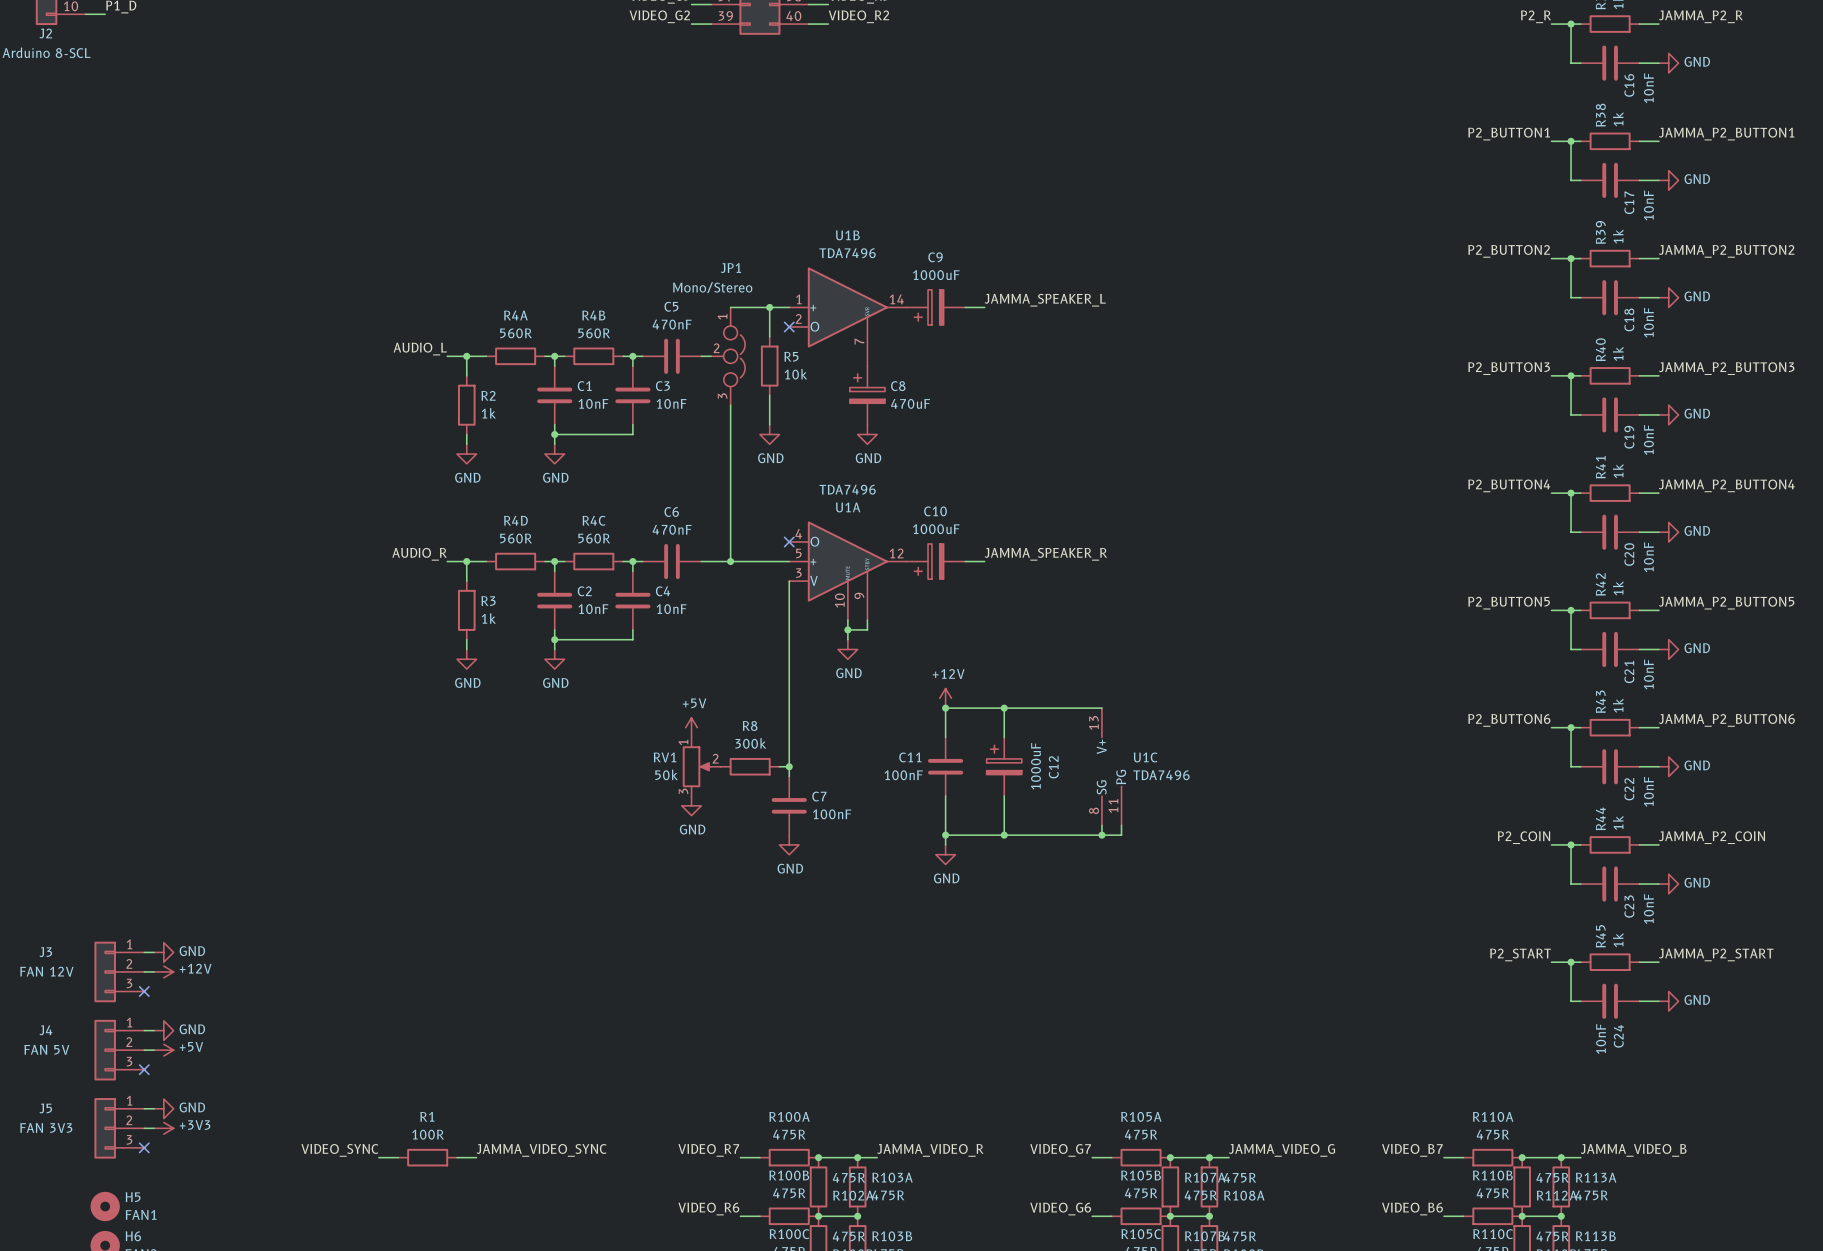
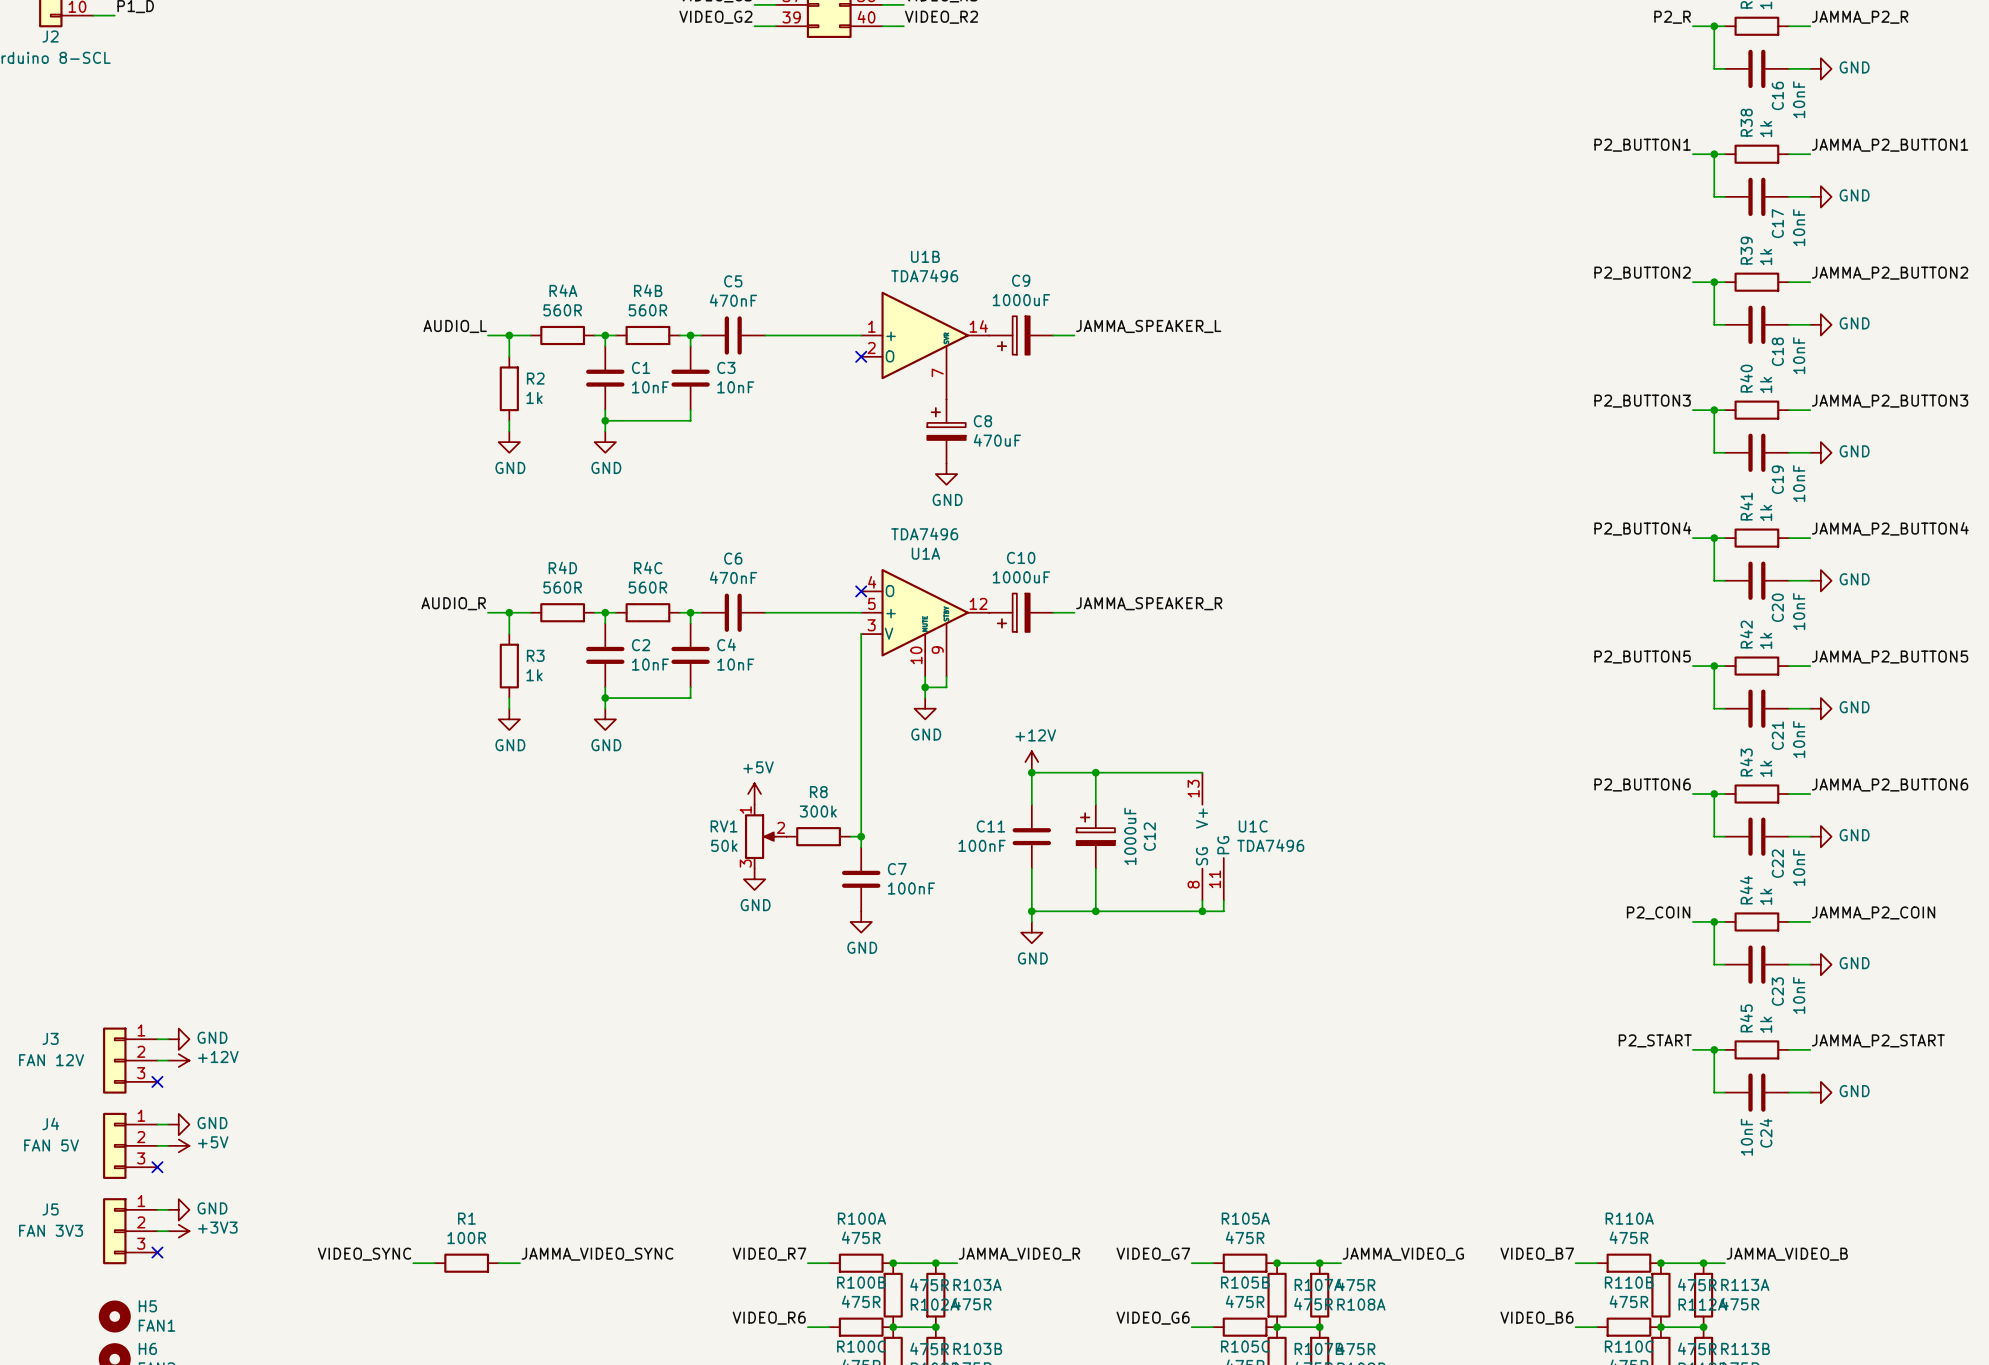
junction: none -> (509, 335)
junction: none -> (605, 335)
junction: none -> (690, 335)
wire: none -> (765, 335) (797, 335)
wire: (769, 307) (769, 336) -> none
junction: (769, 307) -> none
label position: AUDIO_L (420, 349) -> AUDIO_L (455, 326)
wire: (447, 356) (486, 356) -> (487, 335) (530, 335)
wire: (466, 356) (466, 375) -> (509, 335) (509, 356)
junction: (466, 356) -> none
R4A position: (515, 356) -> (562, 335)
wire: (544, 356) (564, 356) -> (594, 335) (615, 335)
junction: (554, 356) -> none
R4B position: (593, 356) -> (647, 335)
wire: (623, 356) (642, 356) -> (679, 335) (701, 335)
junction: (632, 356) -> none
C5 position: (671, 356) -> (733, 335)
wire: (701, 356) (711, 356) -> none
JP1: Mono/Stereo (728, 356) -> none
R5: 10k (769, 366) -> none
junction: none -> (605, 420)
C1 position: (554, 395) -> (605, 378)
C3 position: (632, 395) -> (690, 378)
wire: (769, 395) (769, 424) -> none
R2 position: (466, 405) -> (509, 388)
wire: (730, 405) (730, 561) -> none
wire: (632, 424) (632, 434) (554, 434) -> (690, 410) (690, 420) (605, 420)
wire: (466, 434) (466, 444) -> (509, 420) (509, 431)
junction: (554, 434) -> none
power symbol: GND (769, 434) -> none
power symbol position: GND (466, 454) -> GND (509, 442)
power symbol position: GND (554, 454) -> GND (605, 442)
junction: (730, 561) -> none

